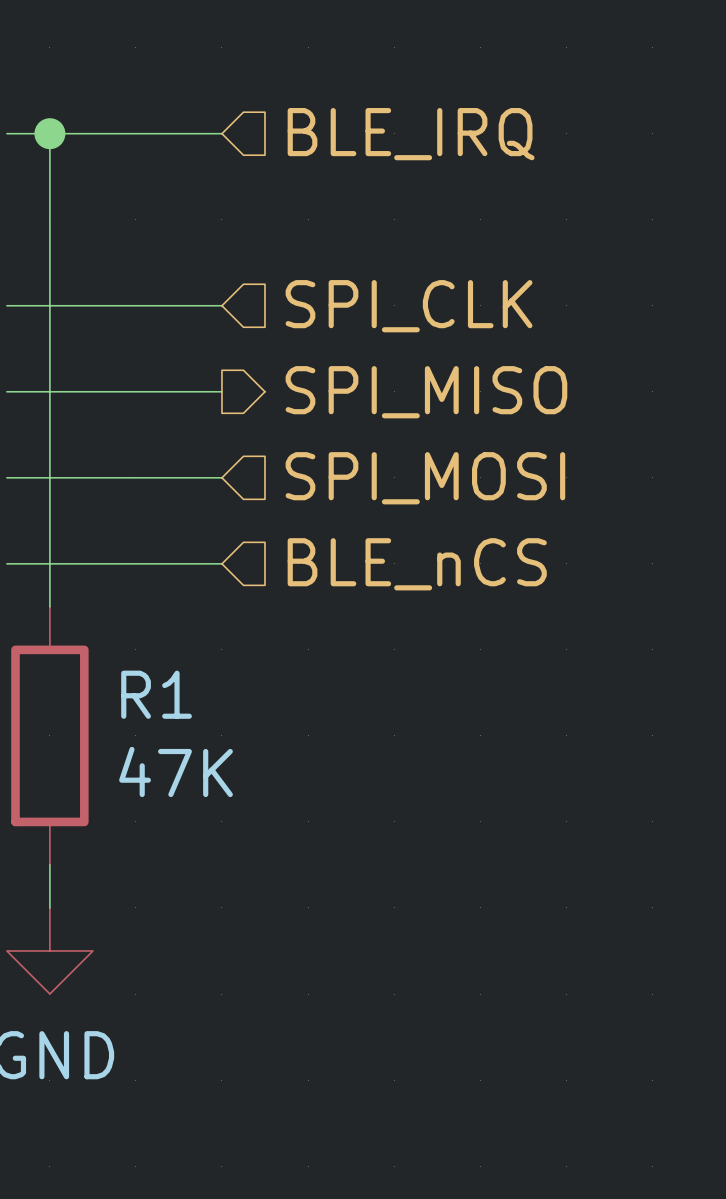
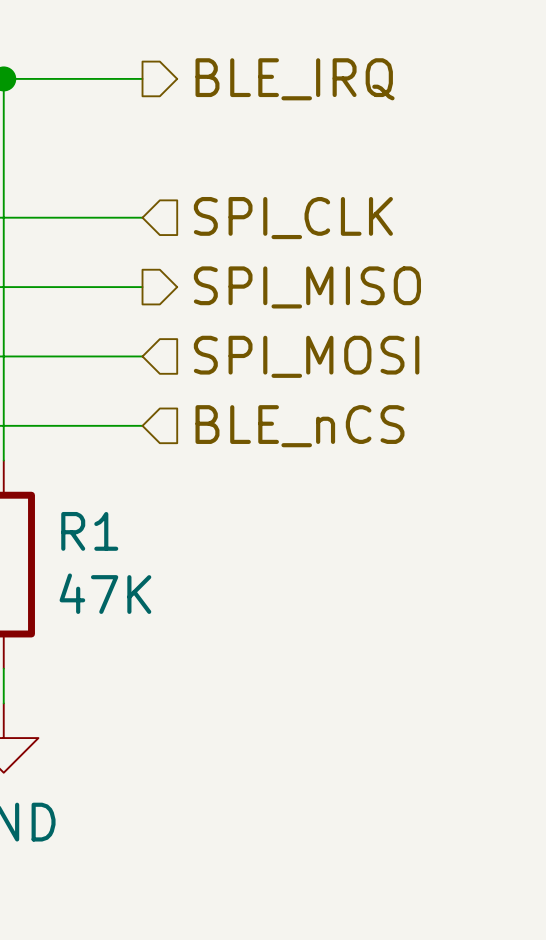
hierarchical label shape: input (411, 134) -> output (295, 79)

